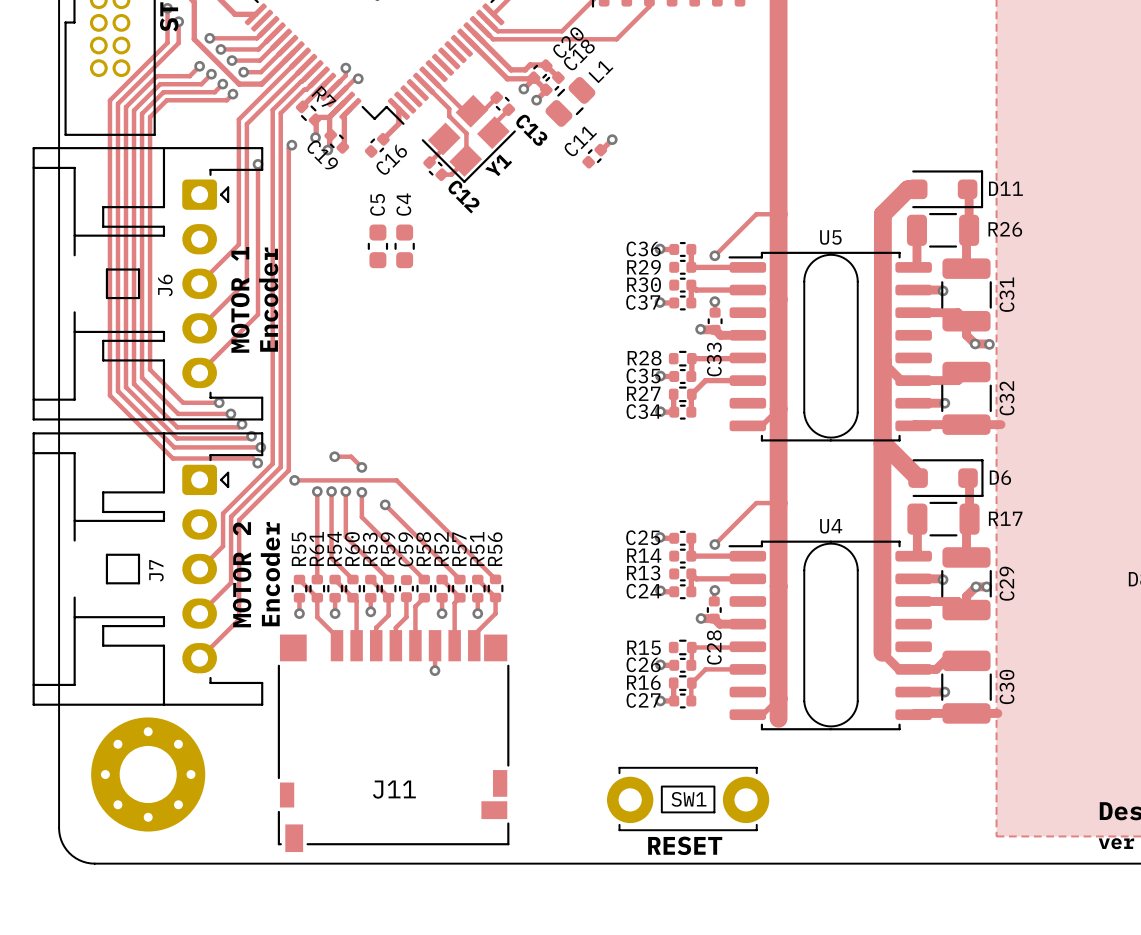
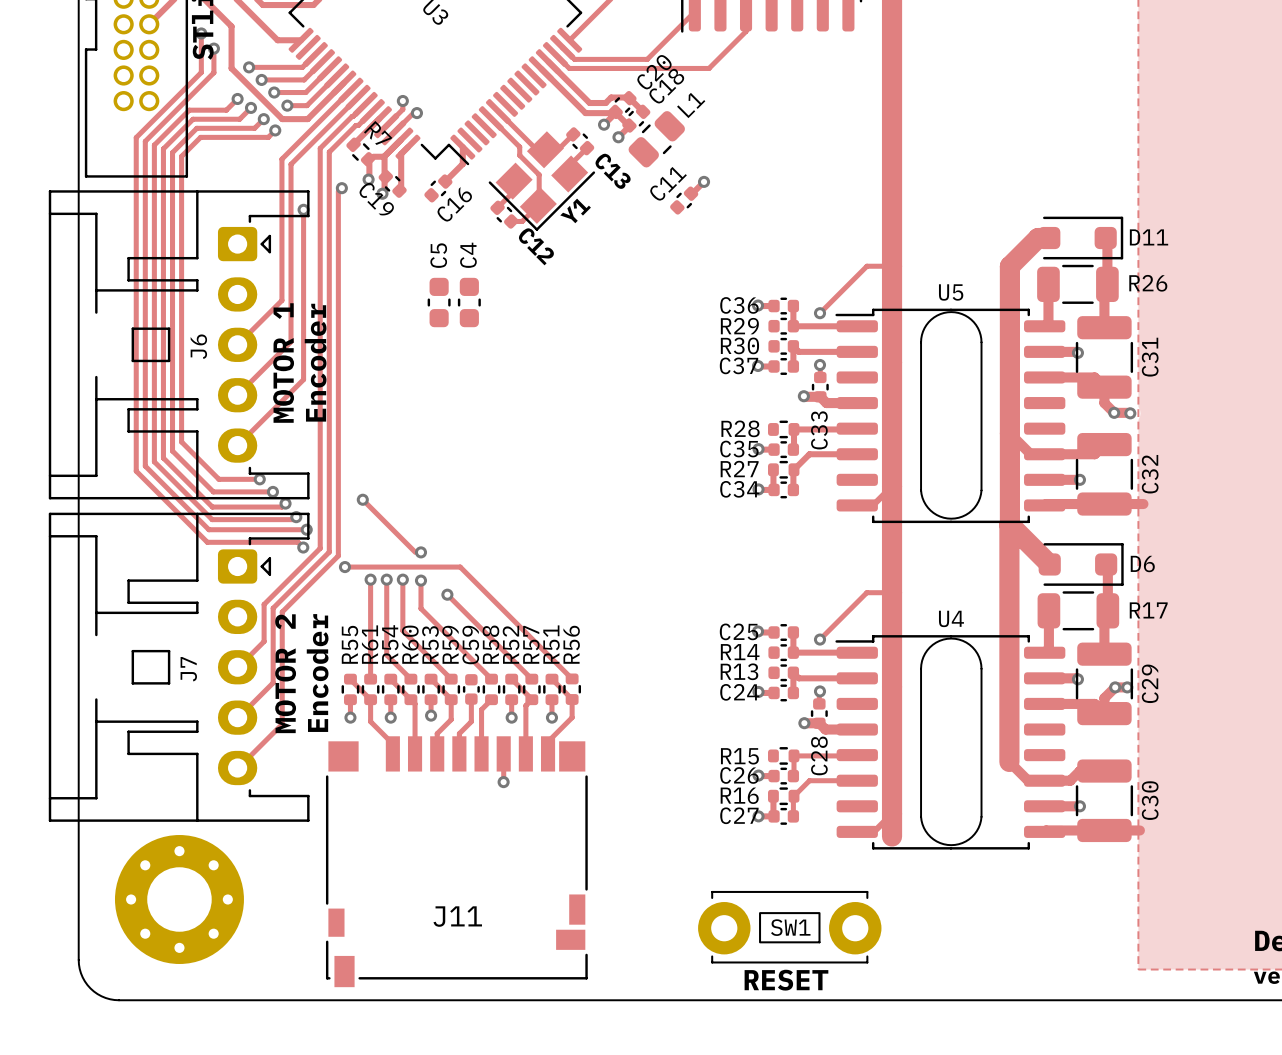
track: none -> (362, 499) (415, 552)
track: (334, 456) (351, 456) (361, 467) -> none
via position: (334, 456) -> (362, 499)

